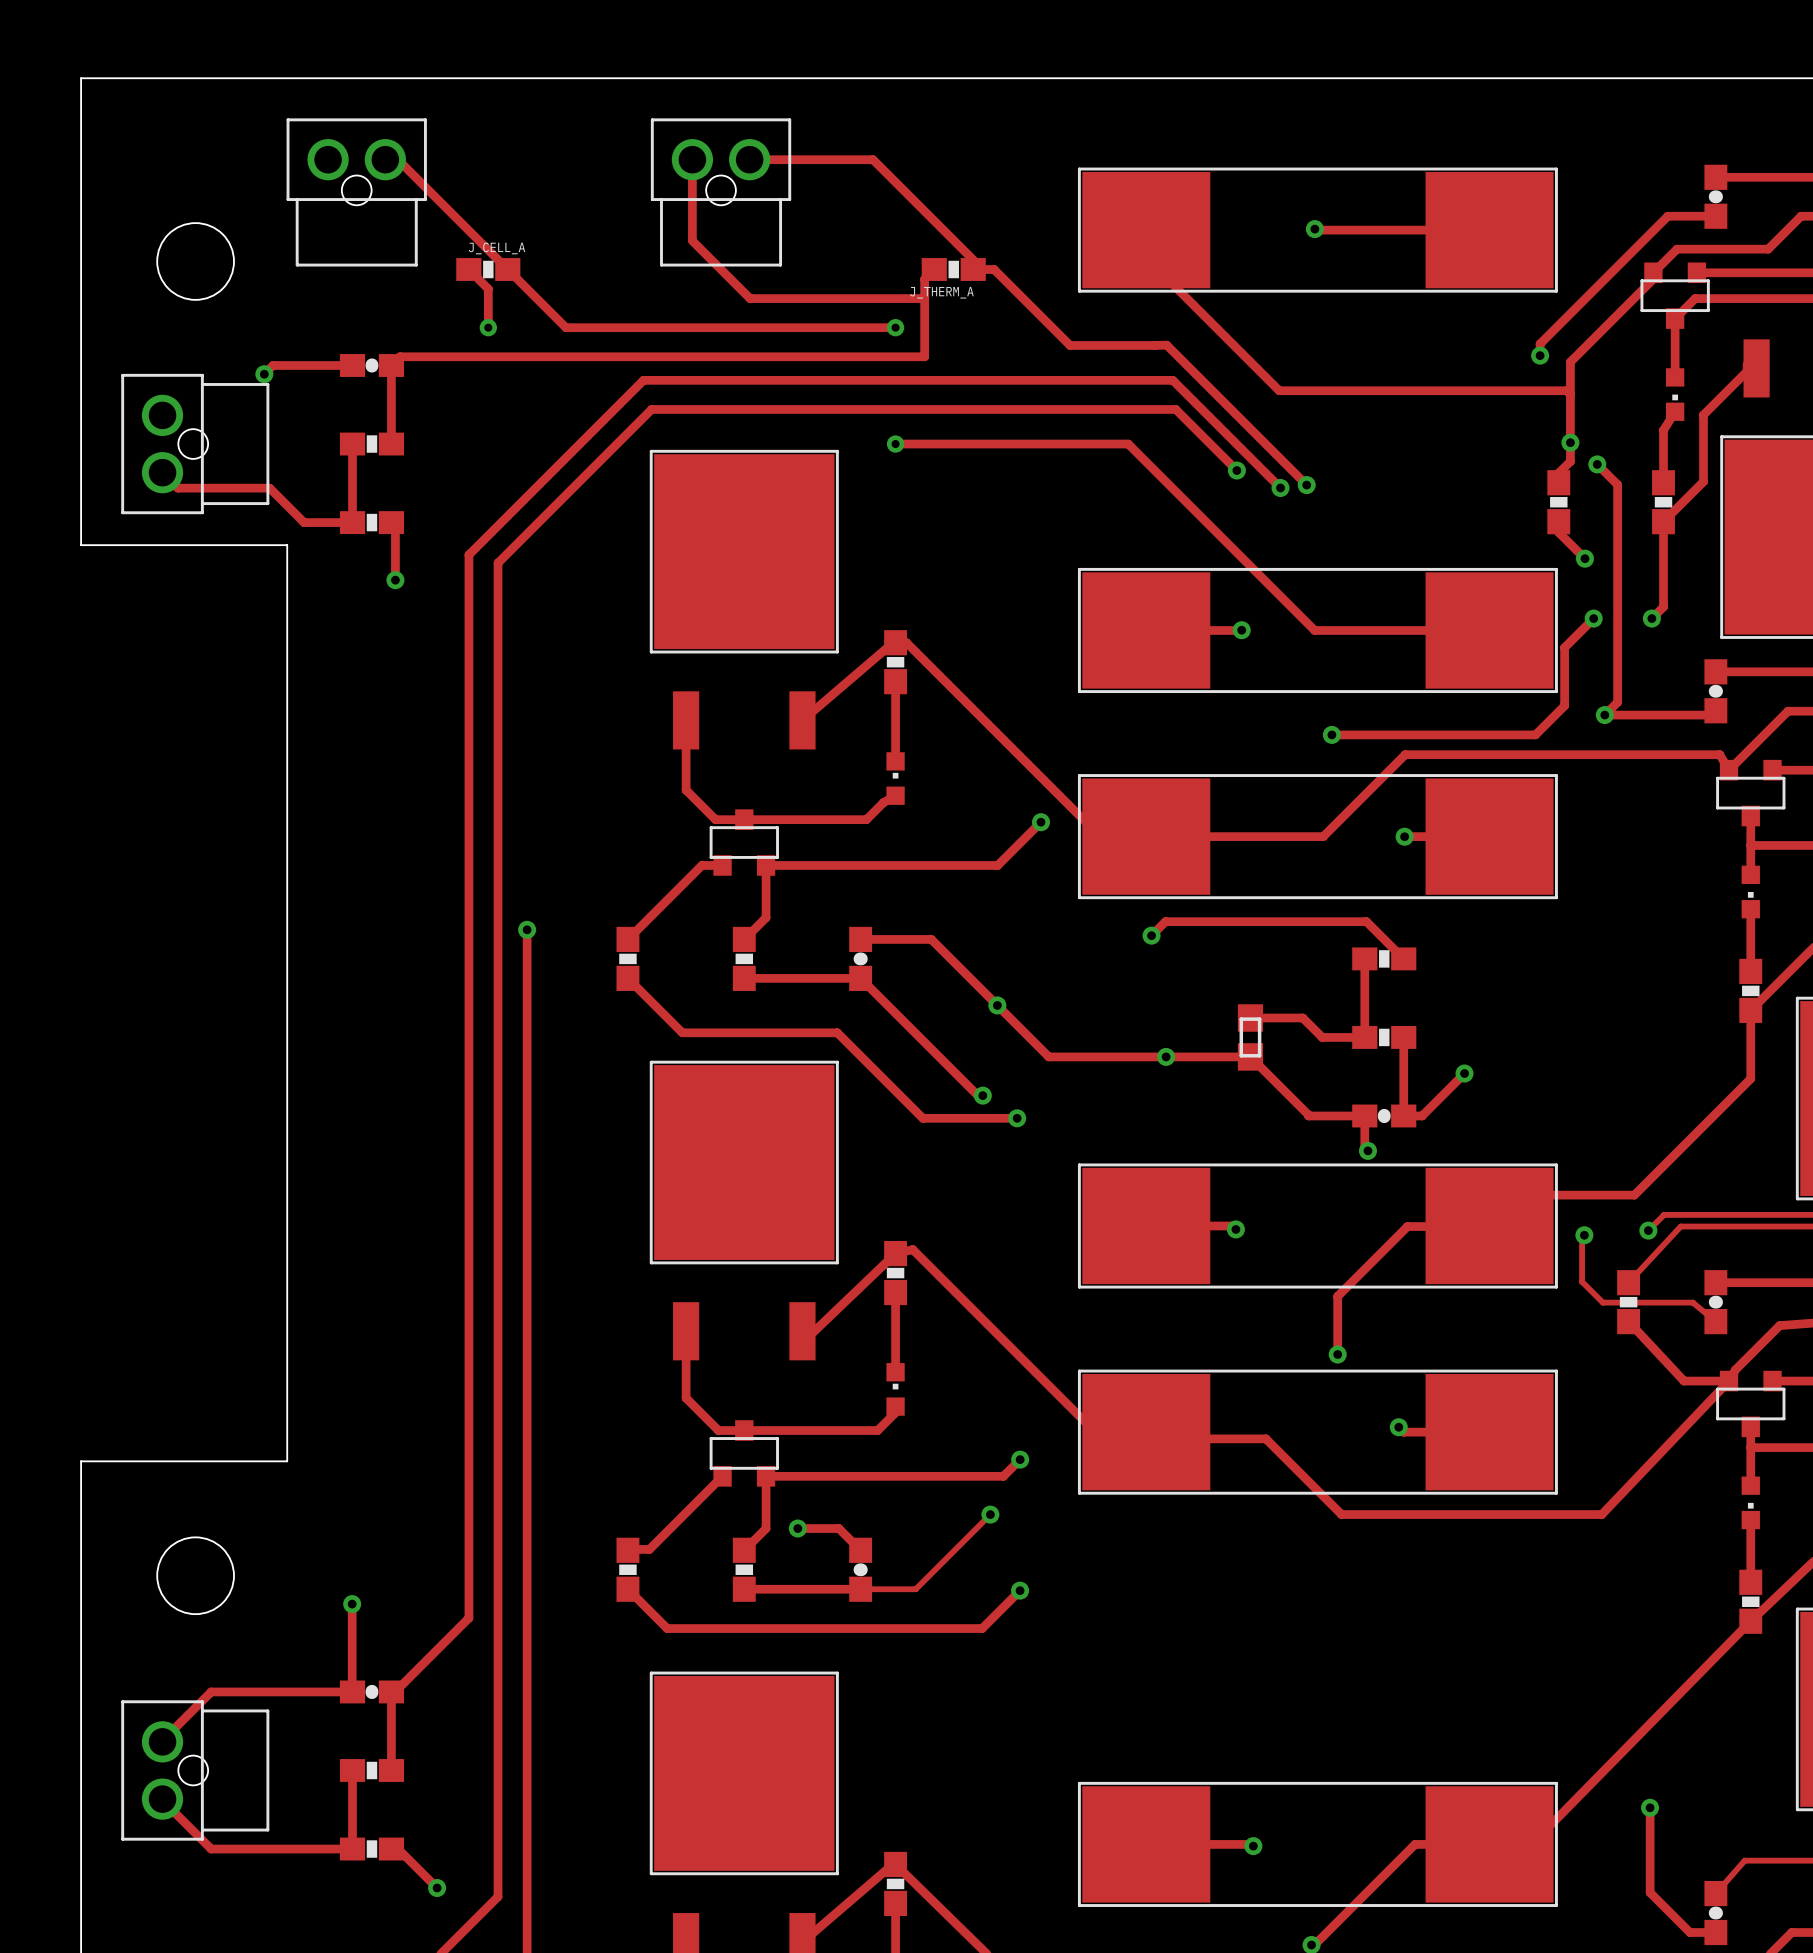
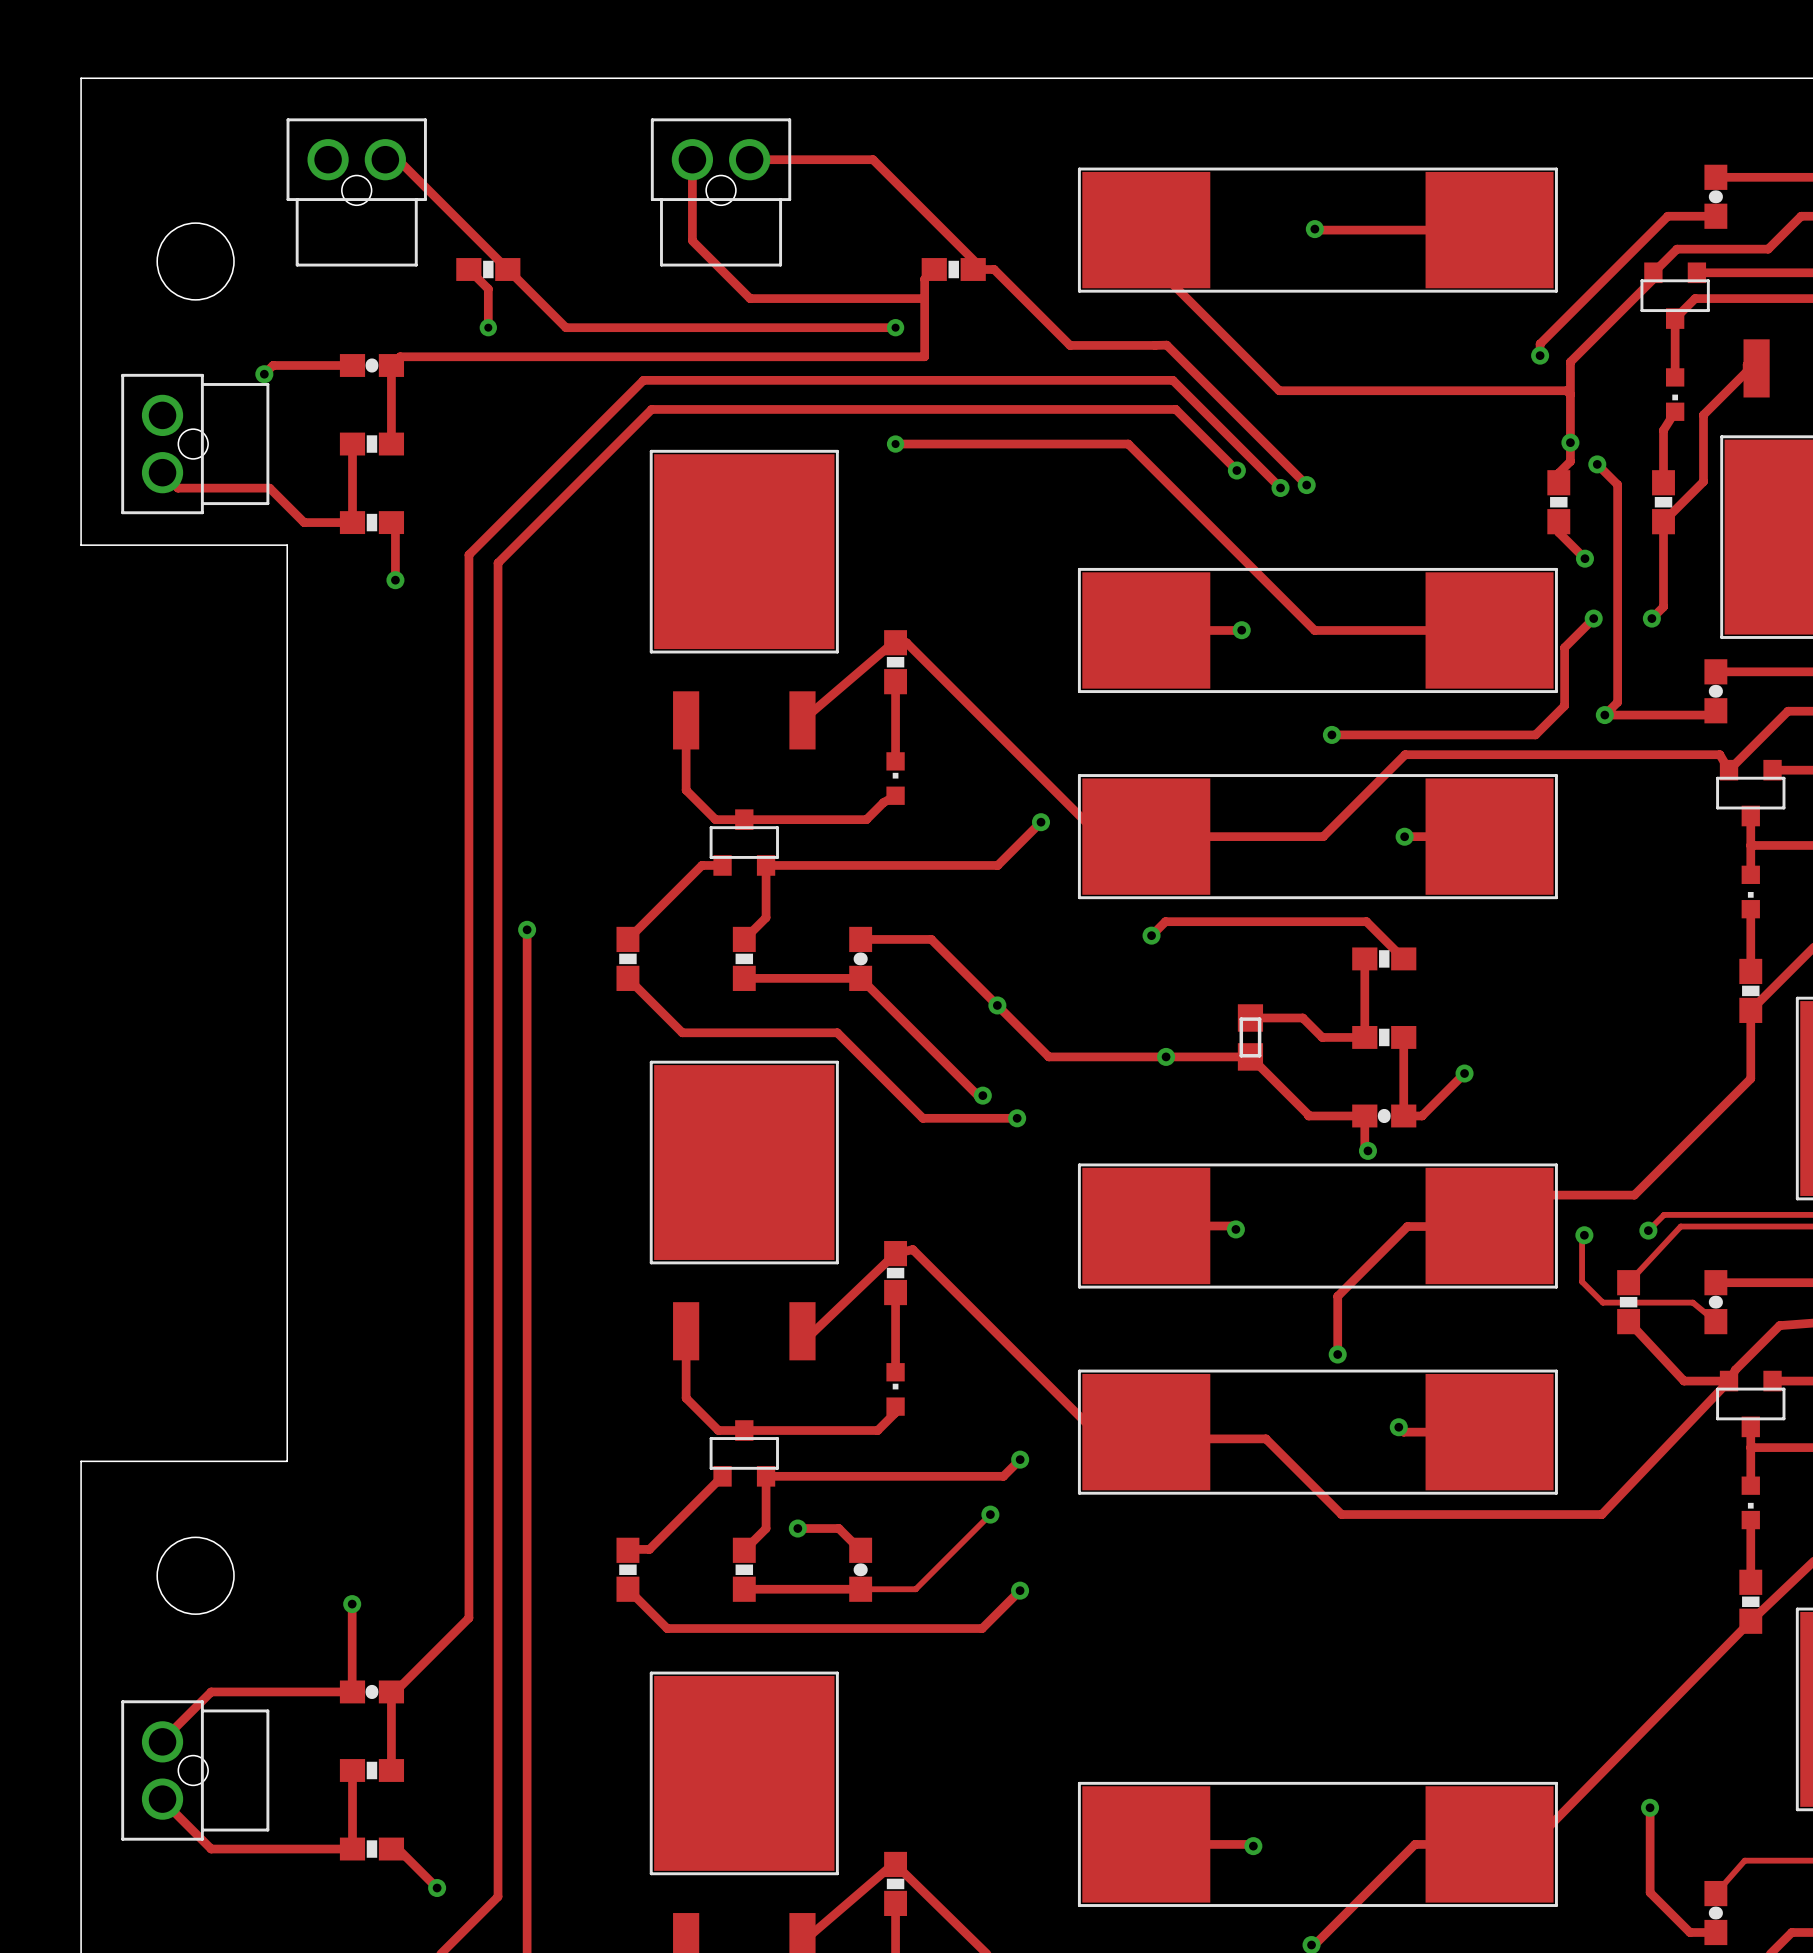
J_CELL_A name: J_CELL_A (497, 248) -> none
J_THERM_A name: J_THERM_A (941, 292) -> none

